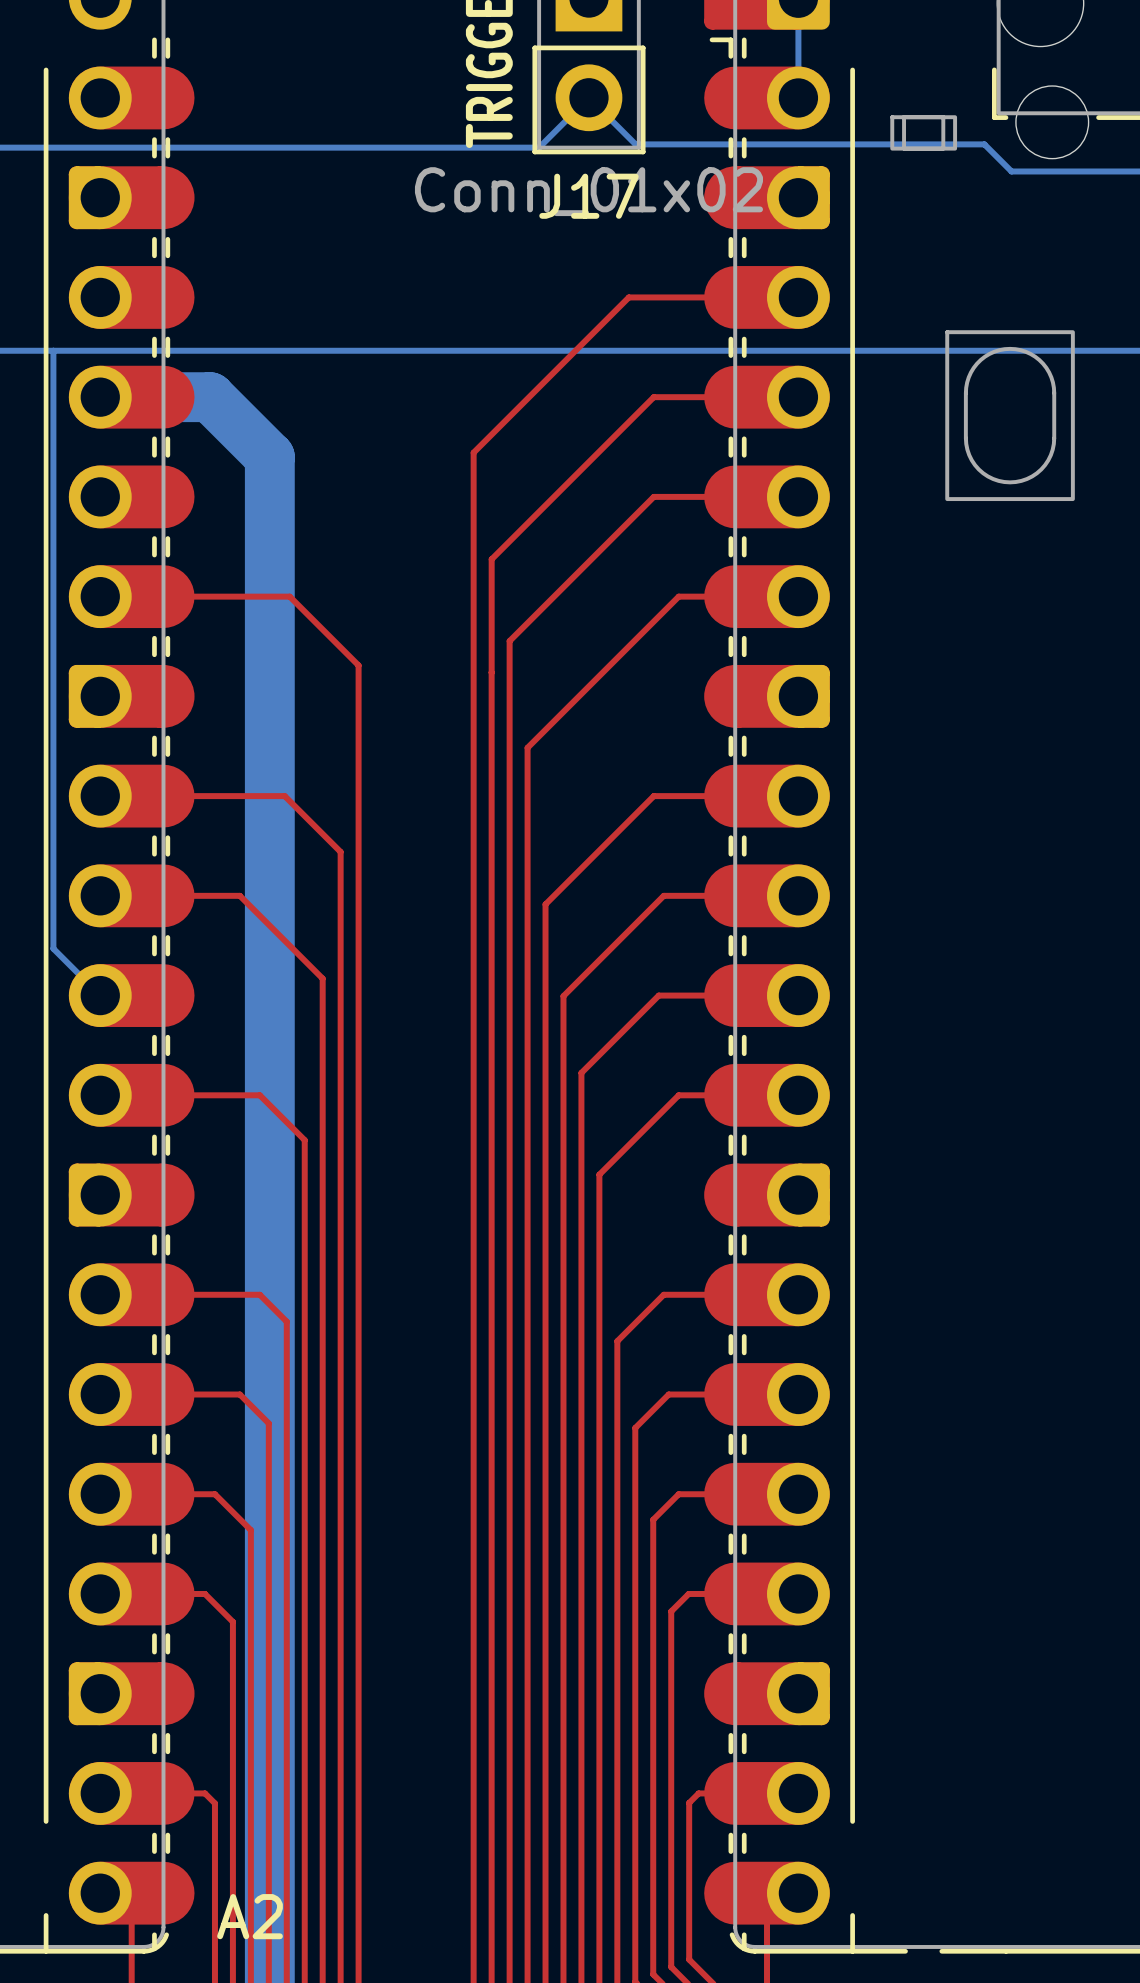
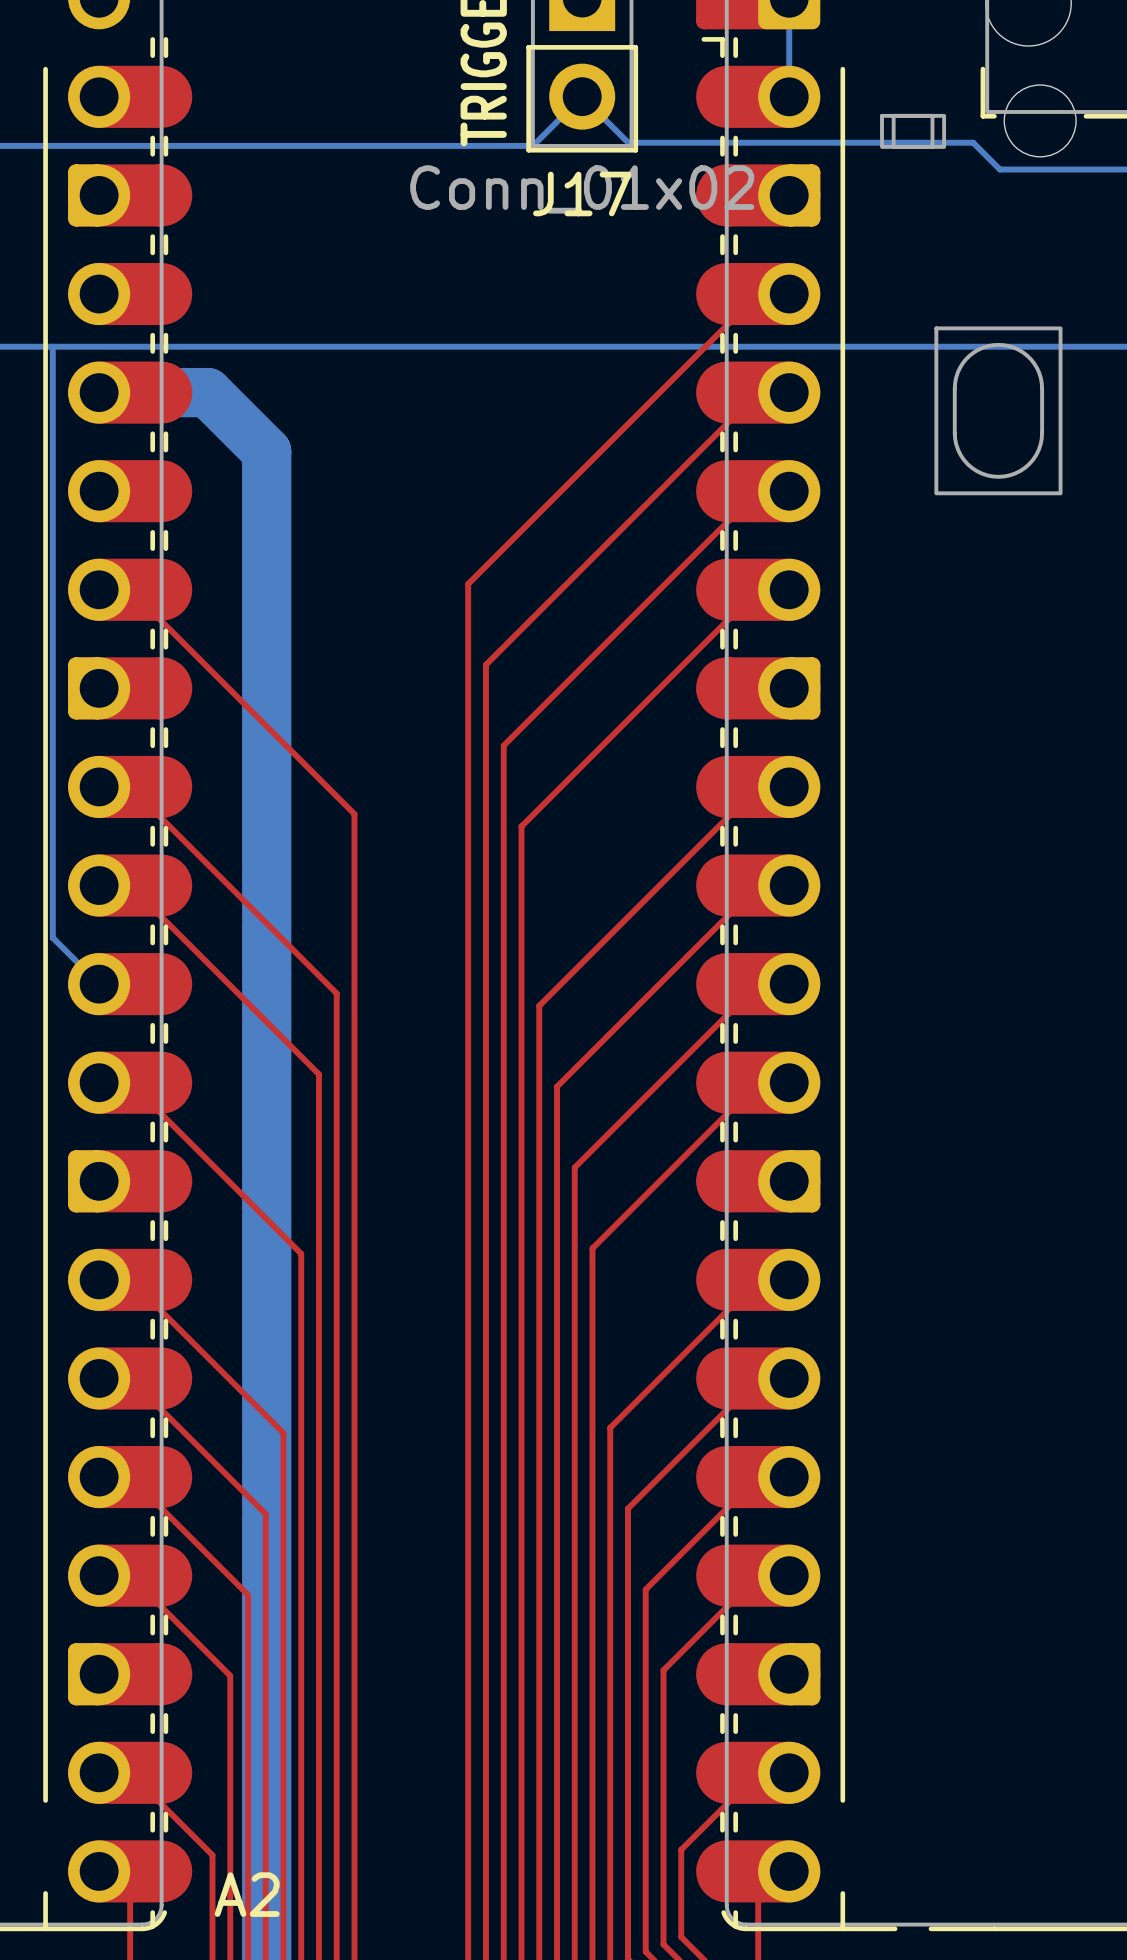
top track: (767, 297) (628, 297) (473, 452) (473, 590) -> (758, 294) (468, 584)
top track: (767, 397) (653, 397) (491, 559) (491, 672) -> (758, 392) (486, 664)
top track: (767, 496) (653, 496) (509, 641) (509, 754) -> (758, 491) (503, 745)
top track: (131, 596) (289, 596) (358, 665) (358, 823) -> (130, 589) (354, 814)
top track: (767, 596) (678, 596) (527, 747) (527, 836) -> (758, 589) (521, 826)
top track: (131, 796) (284, 796) (340, 851) (340, 1005) -> (130, 786) (336, 993)
top track: (767, 796) (653, 796) (545, 904) (545, 1017) -> (758, 786) (539, 1005)
top track: (131, 895) (239, 895) (322, 978) (322, 1086) -> (130, 885) (318, 1074)
top track: (767, 895) (663, 895) (563, 996) (563, 1099) -> (758, 885) (557, 1086)
top track: (767, 995) (658, 995) (581, 1072) (581, 1181) -> (758, 984) (574, 1167)
top track: (131, 1095) (259, 1095) (304, 1140) (304, 1268) -> (130, 1082) (301, 1253)
top track: (767, 1095) (678, 1095) (599, 1174) (599, 1262) -> (758, 1082) (592, 1248)
top track: (131, 1294) (259, 1294) (286, 1321) (286, 1449) -> (130, 1279) (283, 1433)
top track: (767, 1294) (663, 1294) (617, 1341) (617, 1444) -> (758, 1279) (610, 1427)
top track: (131, 1394) (239, 1394) (268, 1423) (268, 1531) -> (130, 1378) (265, 1514)
top track: (767, 1394) (668, 1394) (635, 1427) (635, 1526) -> (758, 1378) (627, 1508)
top track: (131, 1494) (214, 1494) (250, 1530) (250, 1613) -> (130, 1477) (247, 1594)
top track: (767, 1494) (678, 1494) (653, 1519) (653, 1608) -> (758, 1477) (645, 1589)
top track: (131, 1593) (205, 1593) (232, 1621) (232, 1695) -> (130, 1575) (230, 1675)
top track: (767, 1593) (688, 1593) (671, 1611) (671, 1689) -> (758, 1575) (663, 1670)
top track: (131, 1793) (205, 1793) (214, 1803) (214, 1876) -> (130, 1772) (212, 1855)
top track: (767, 1793) (698, 1793) (689, 1802) (689, 1871) -> (758, 1772) (681, 1849)

